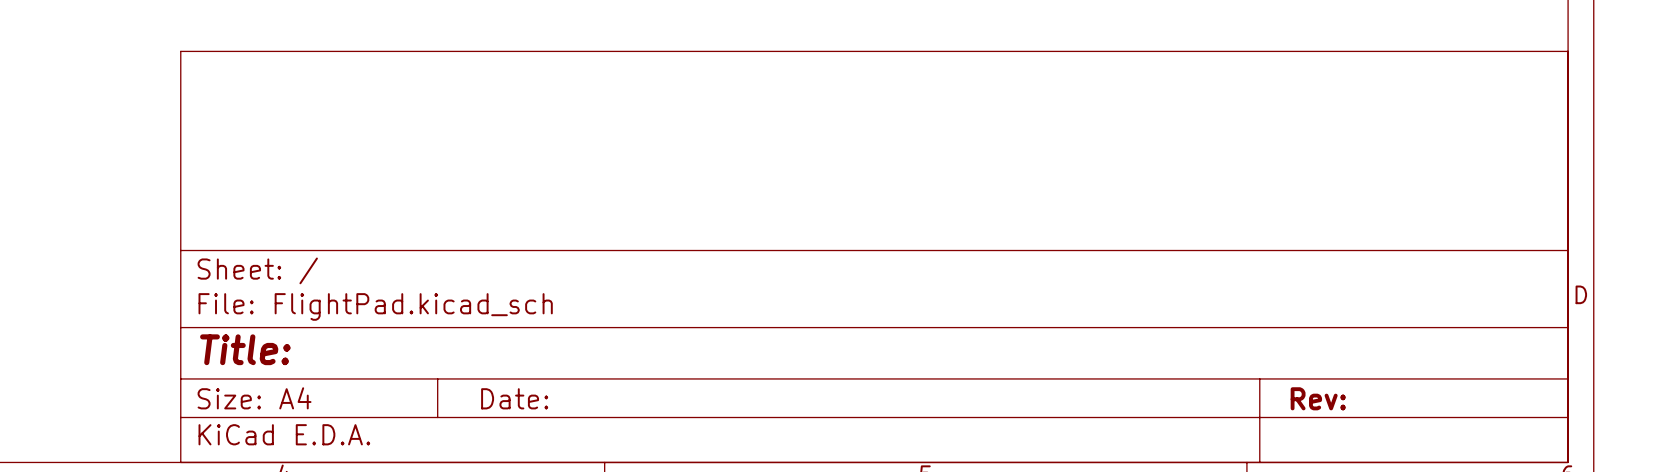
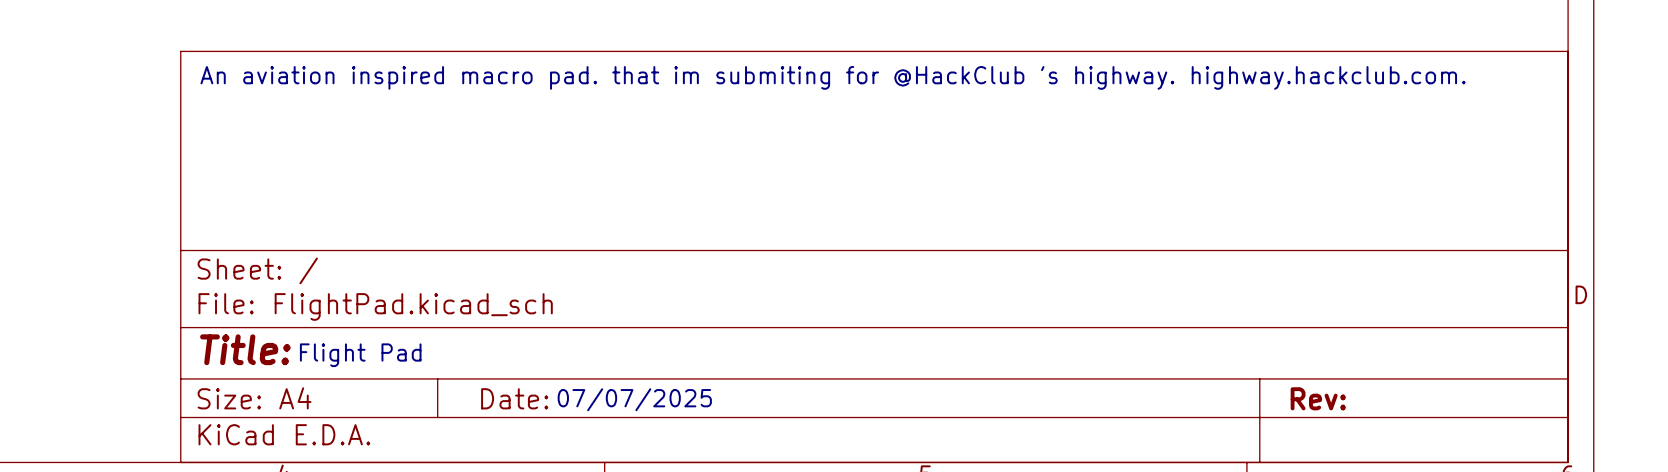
text: none -> An aviation inspired macro pad. that im submiting for @HackClub 's highway. highway.hackclub.com. (833, 77)
text: none -> Flight Pad (360, 355)
text: none -> 07/07/2025 (634, 399)

